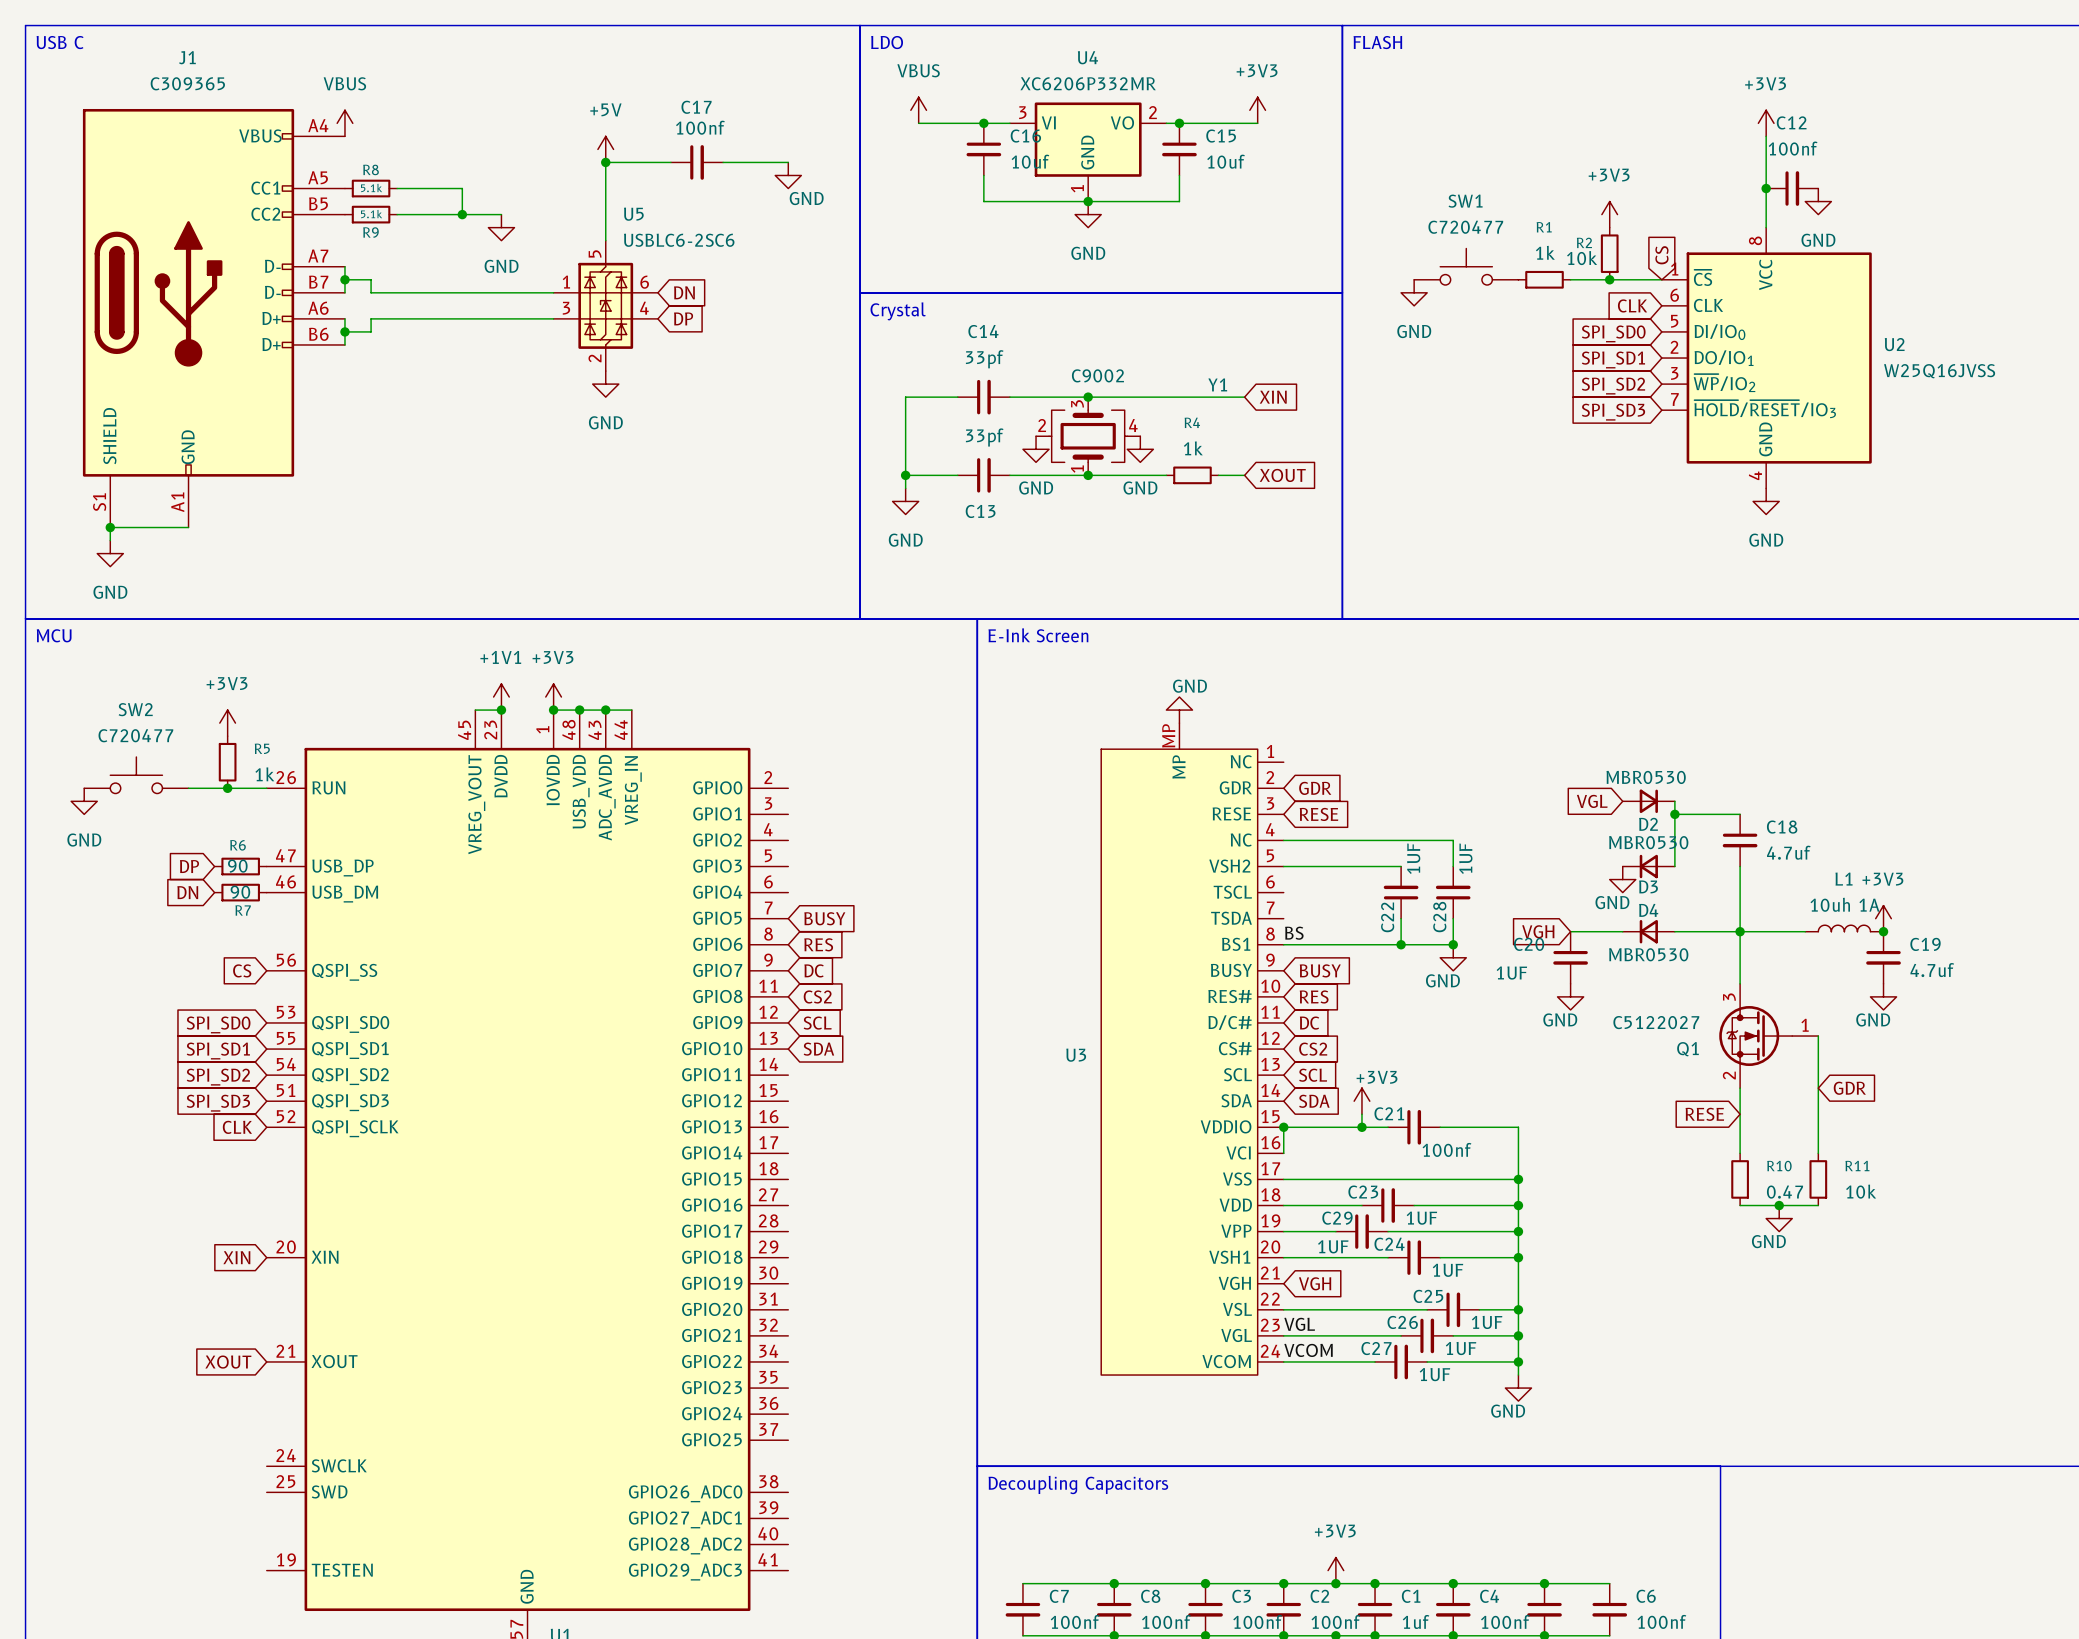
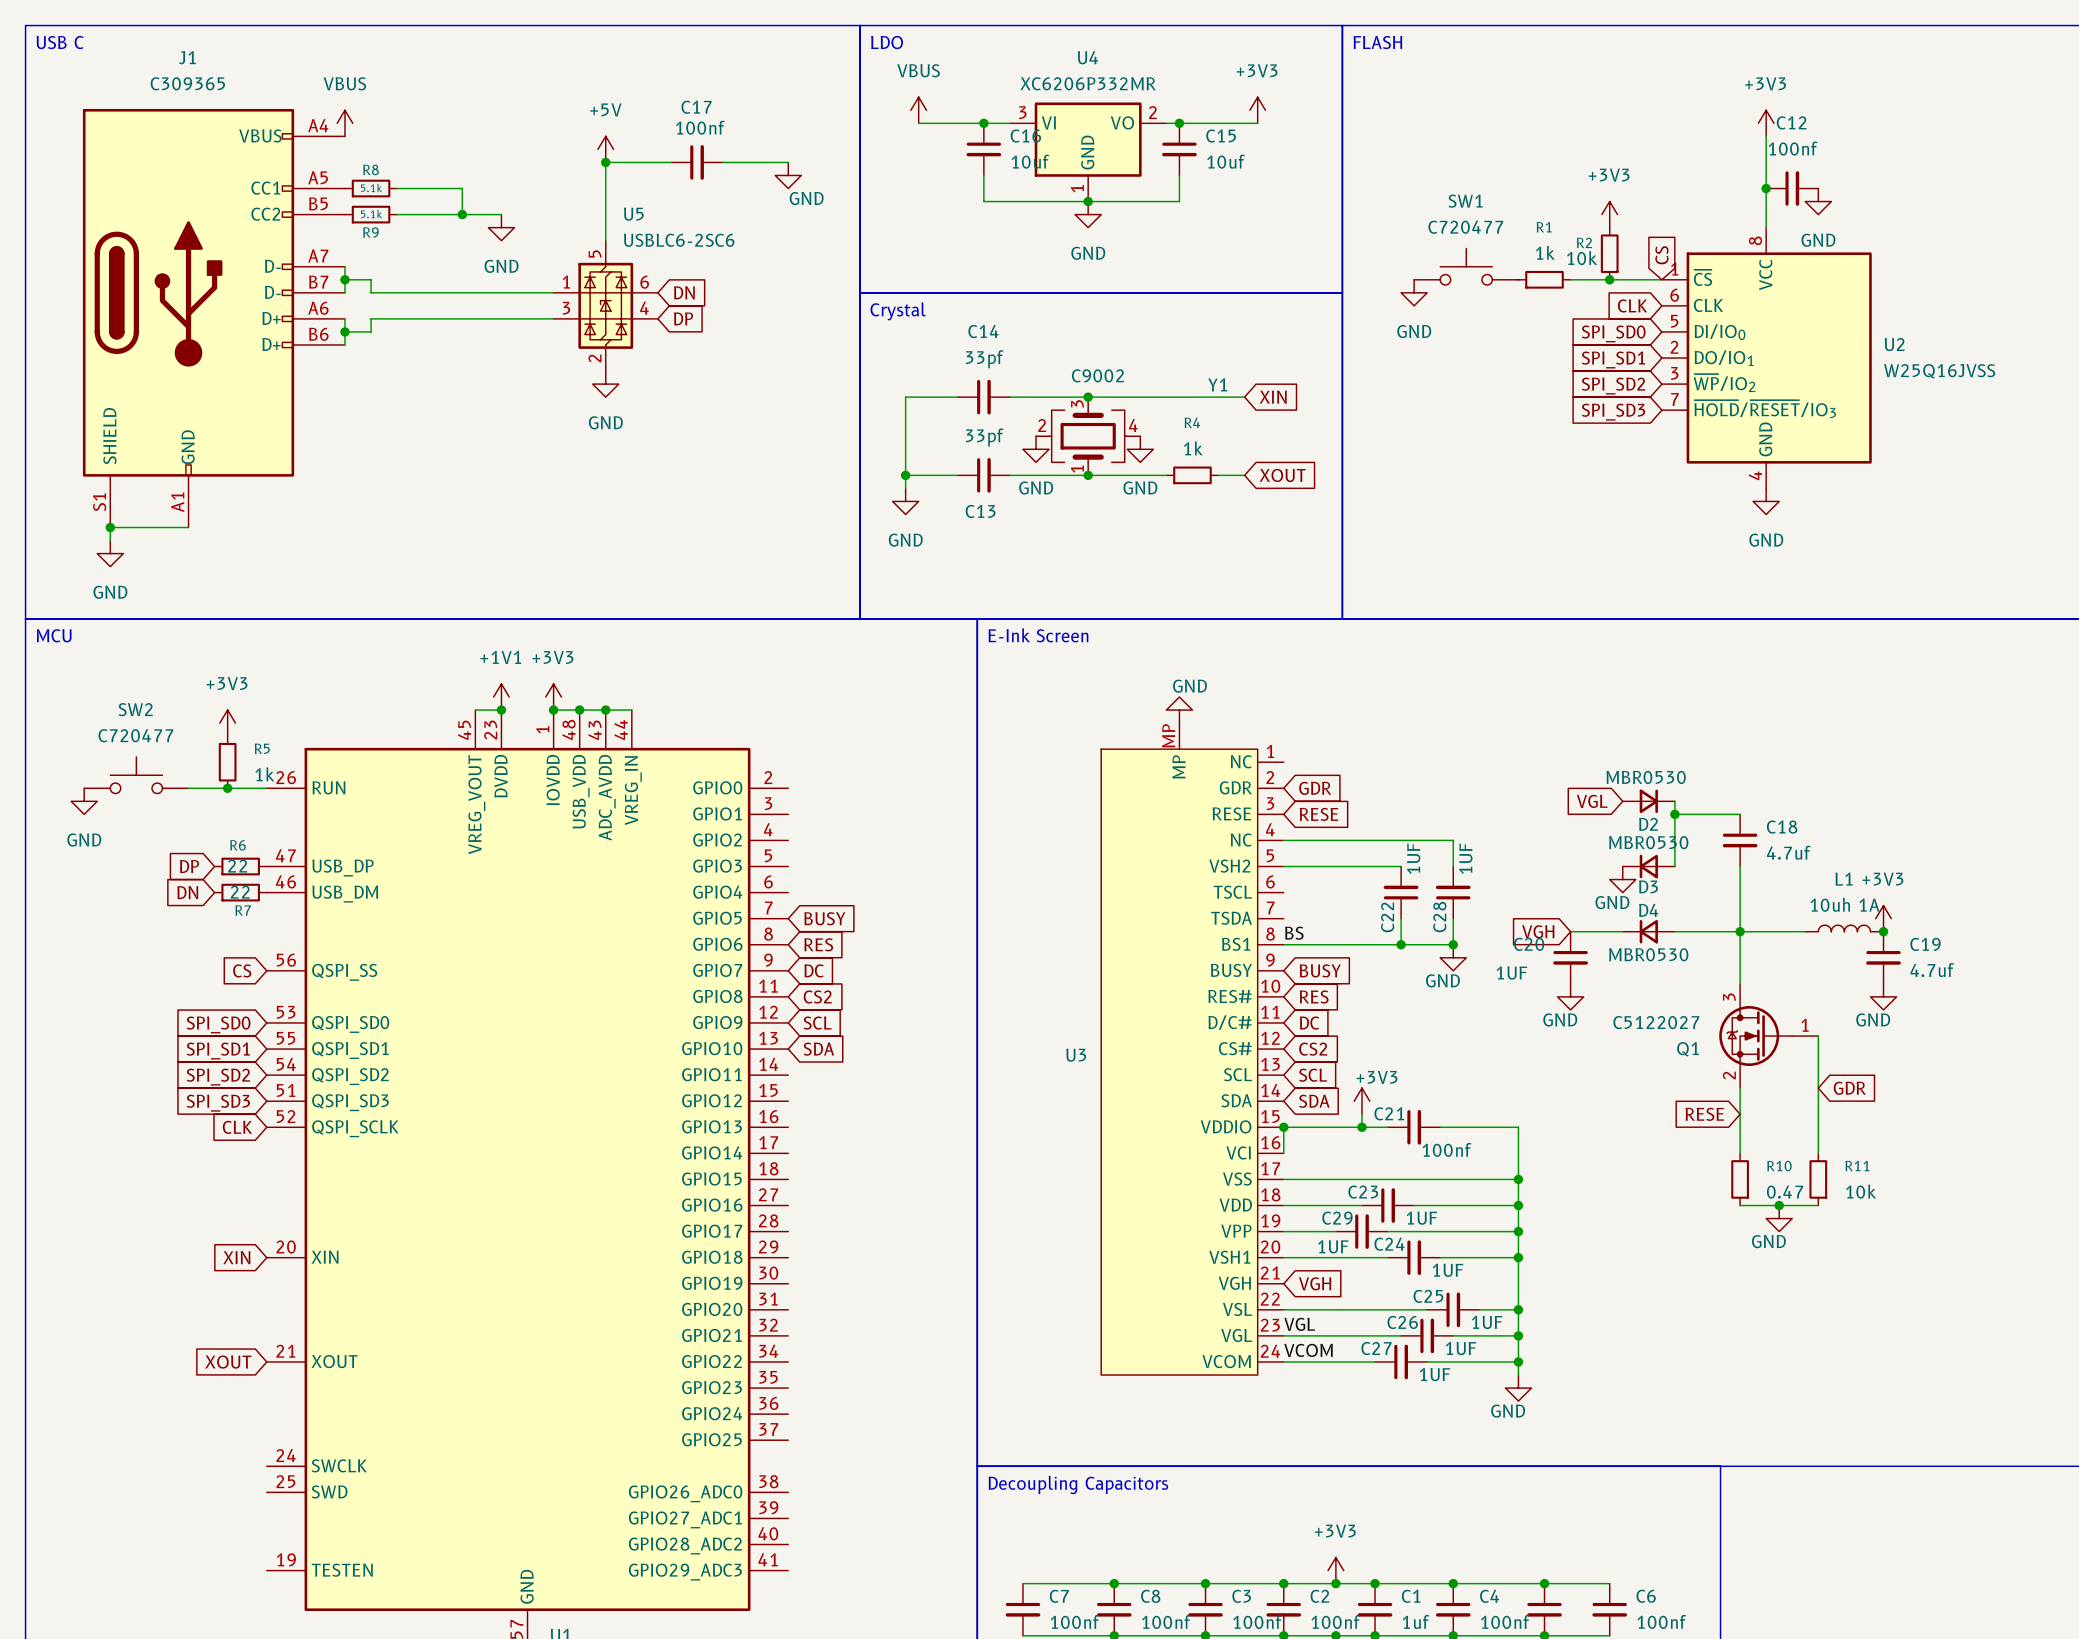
R6 value: 90 (237, 866) -> 22 (237, 866)
R7 value: 90 (240, 892) -> 22 (240, 892)

